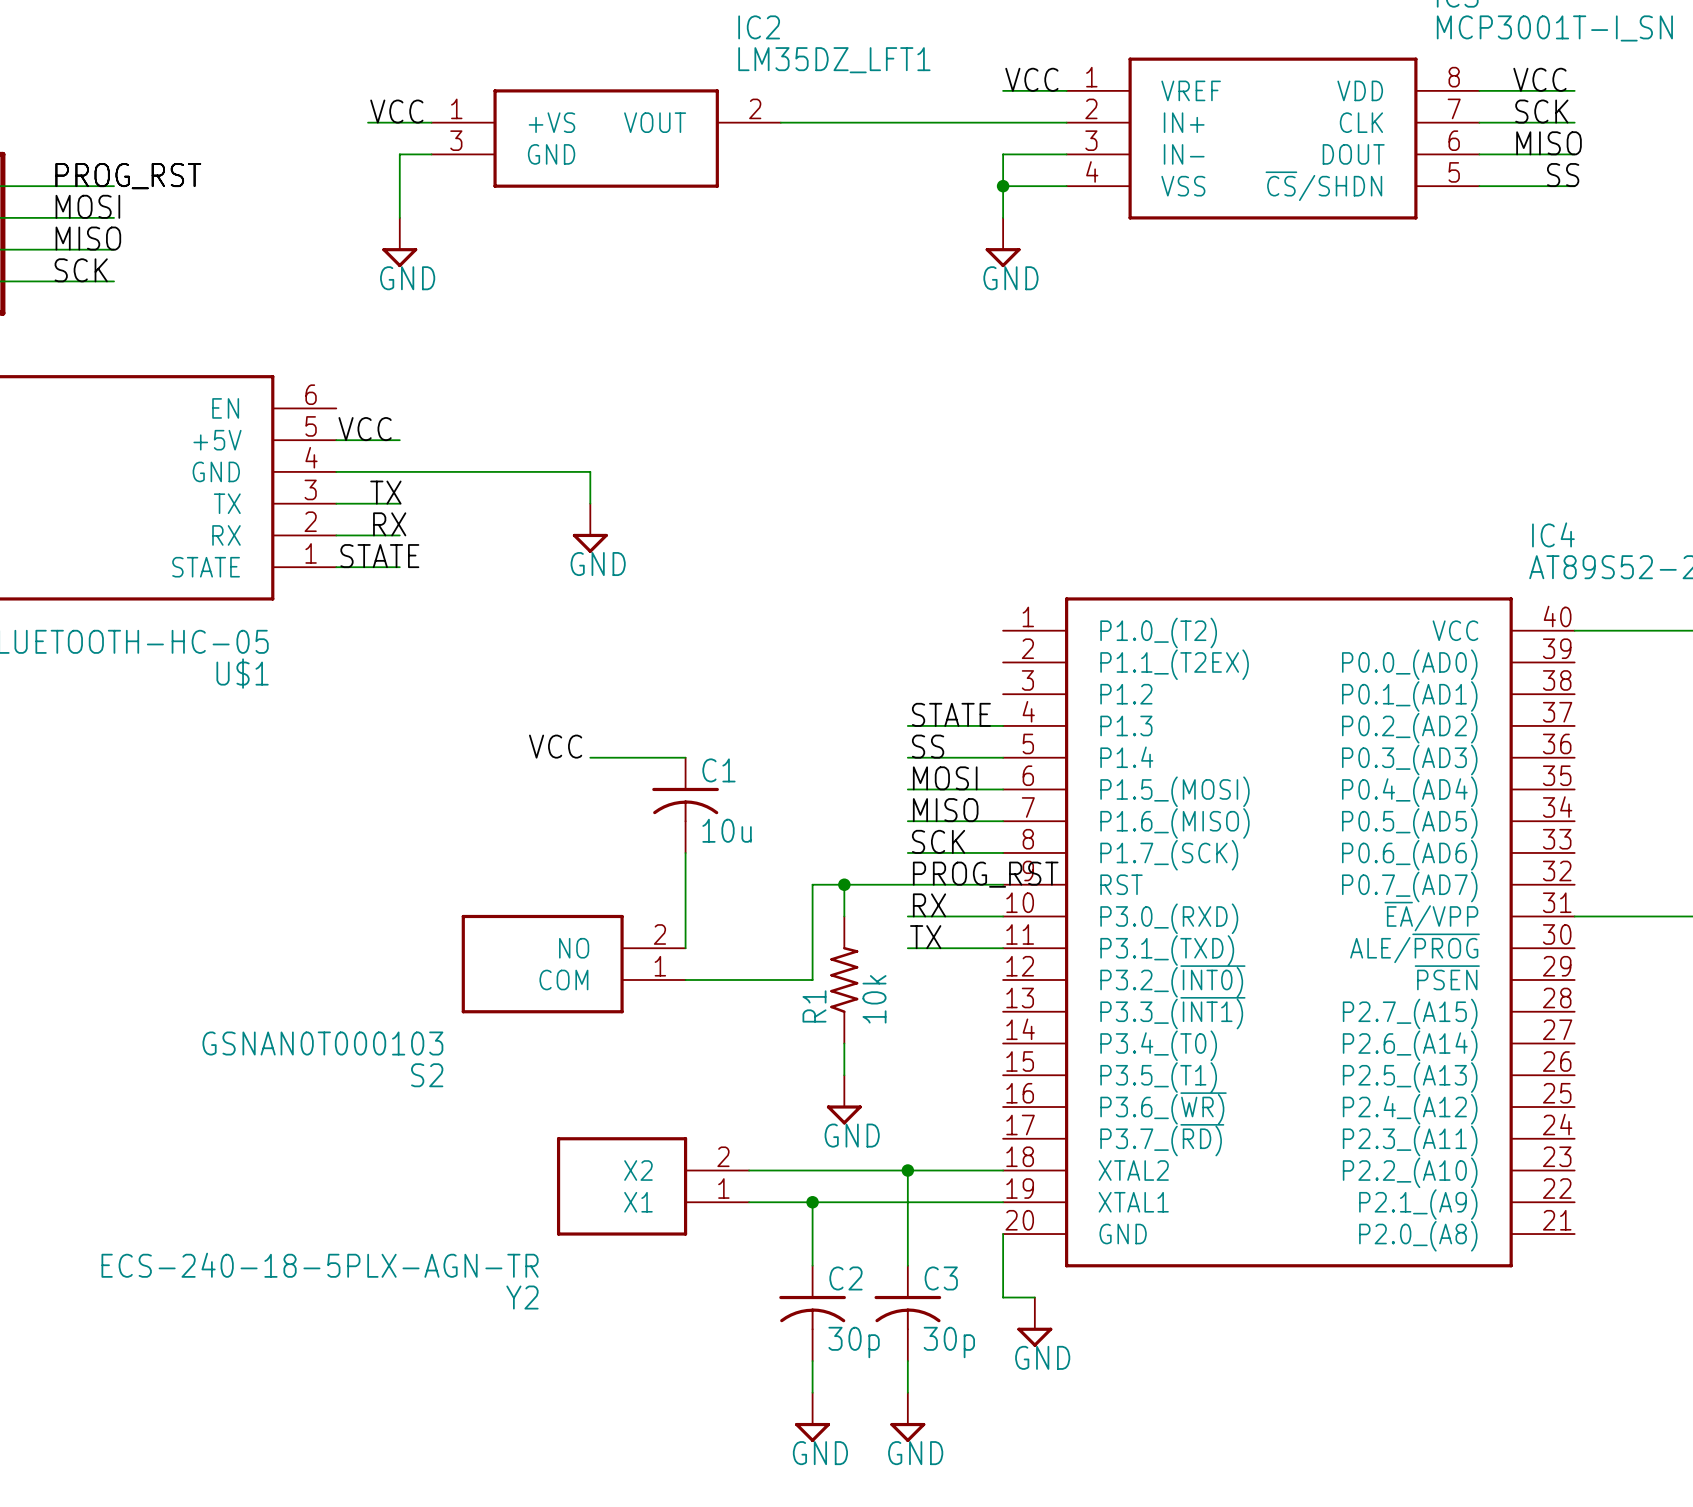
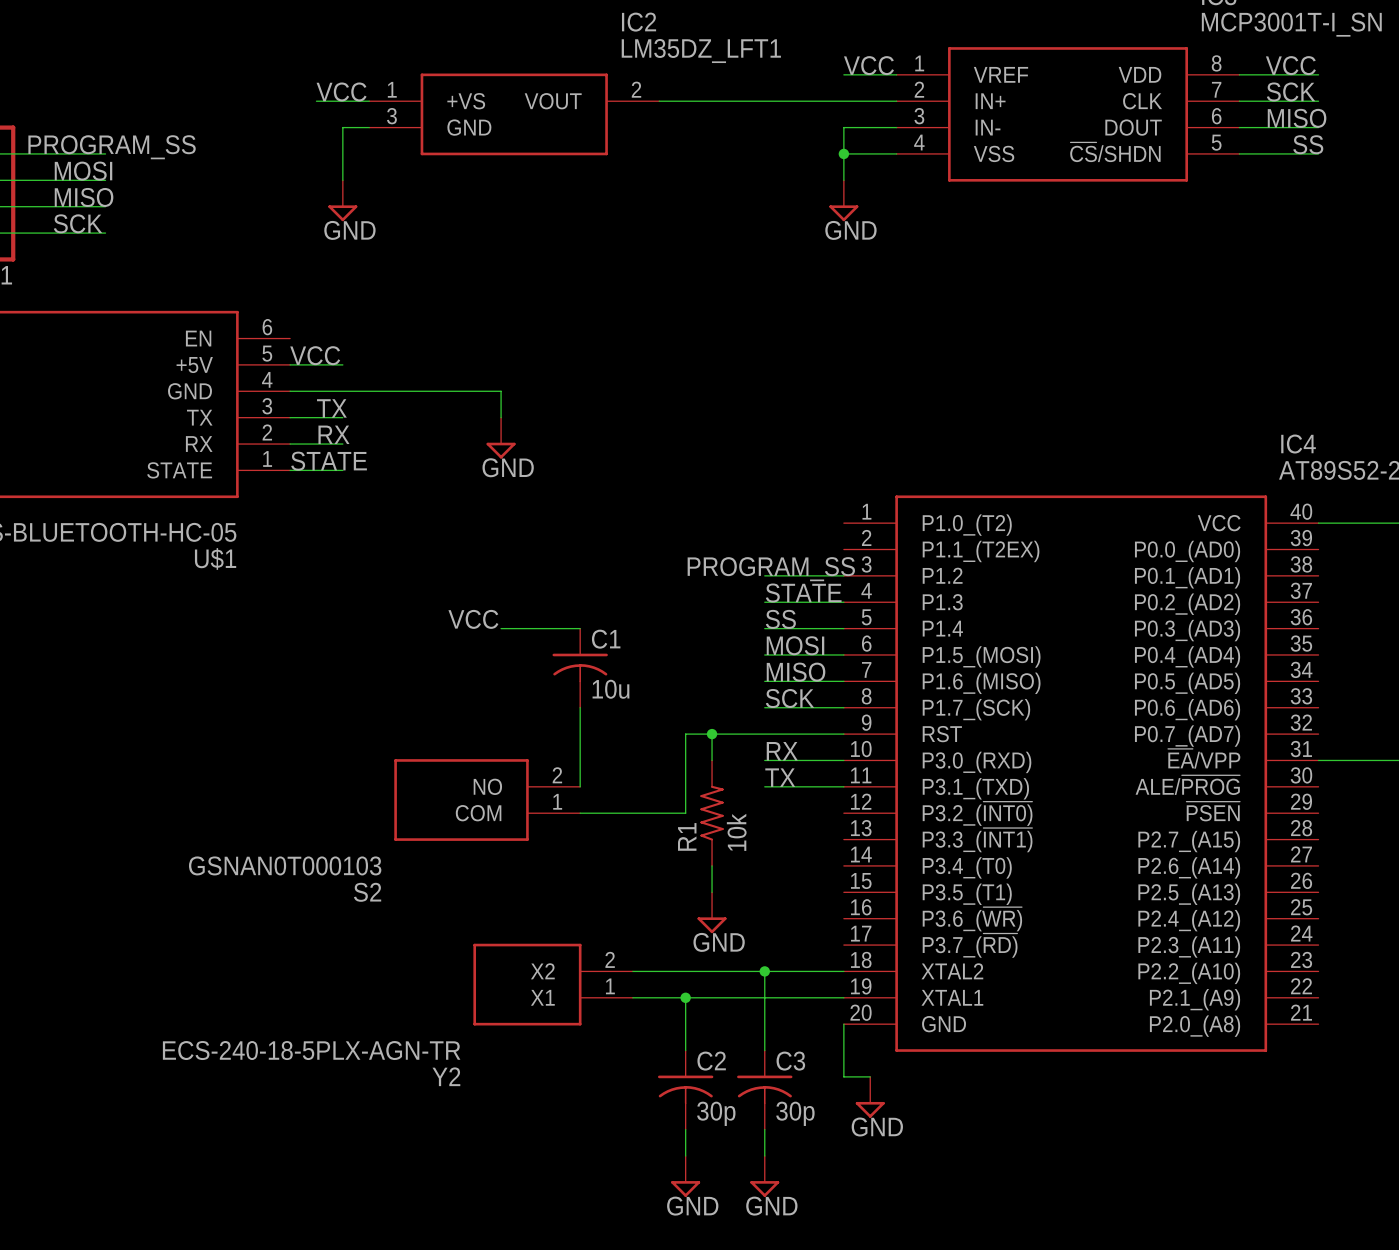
label: PROG_RST (128, 176) -> PROGRAM_SS (112, 147)
label: none -> PROGRAM_SS (771, 569)
wire: none -> (764, 575) (843, 575)
label: PROG_RST (985, 874) -> none

